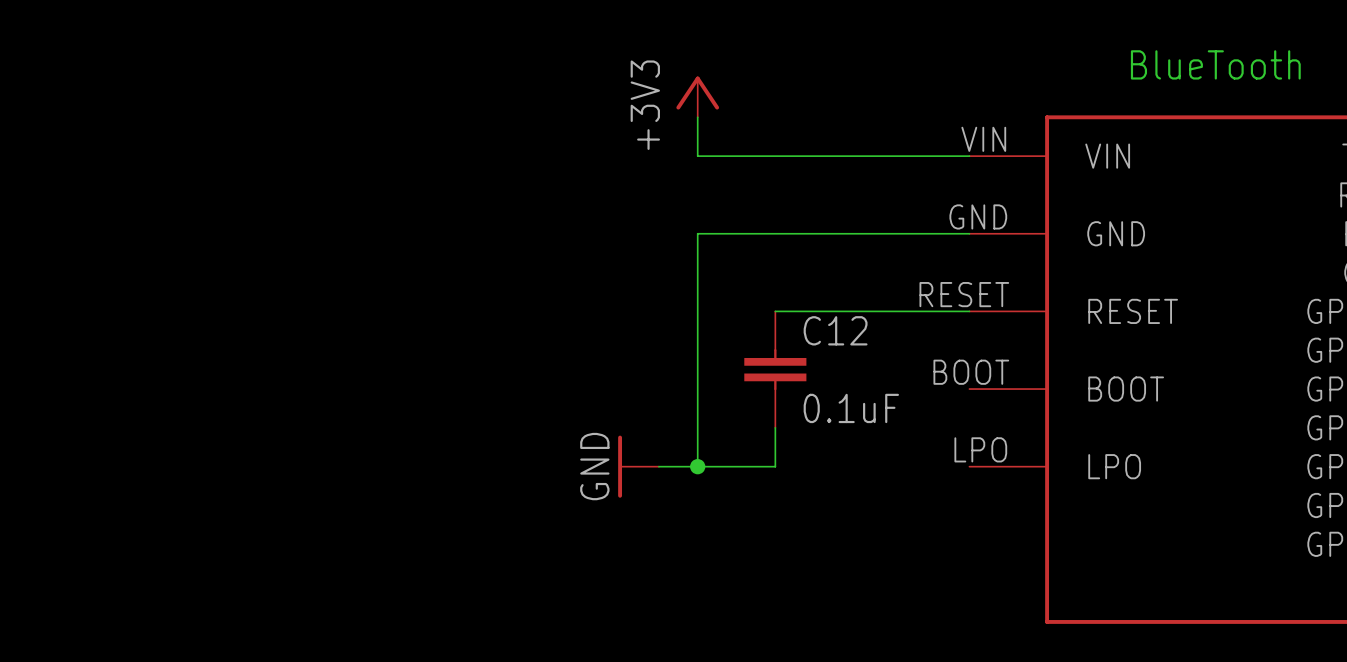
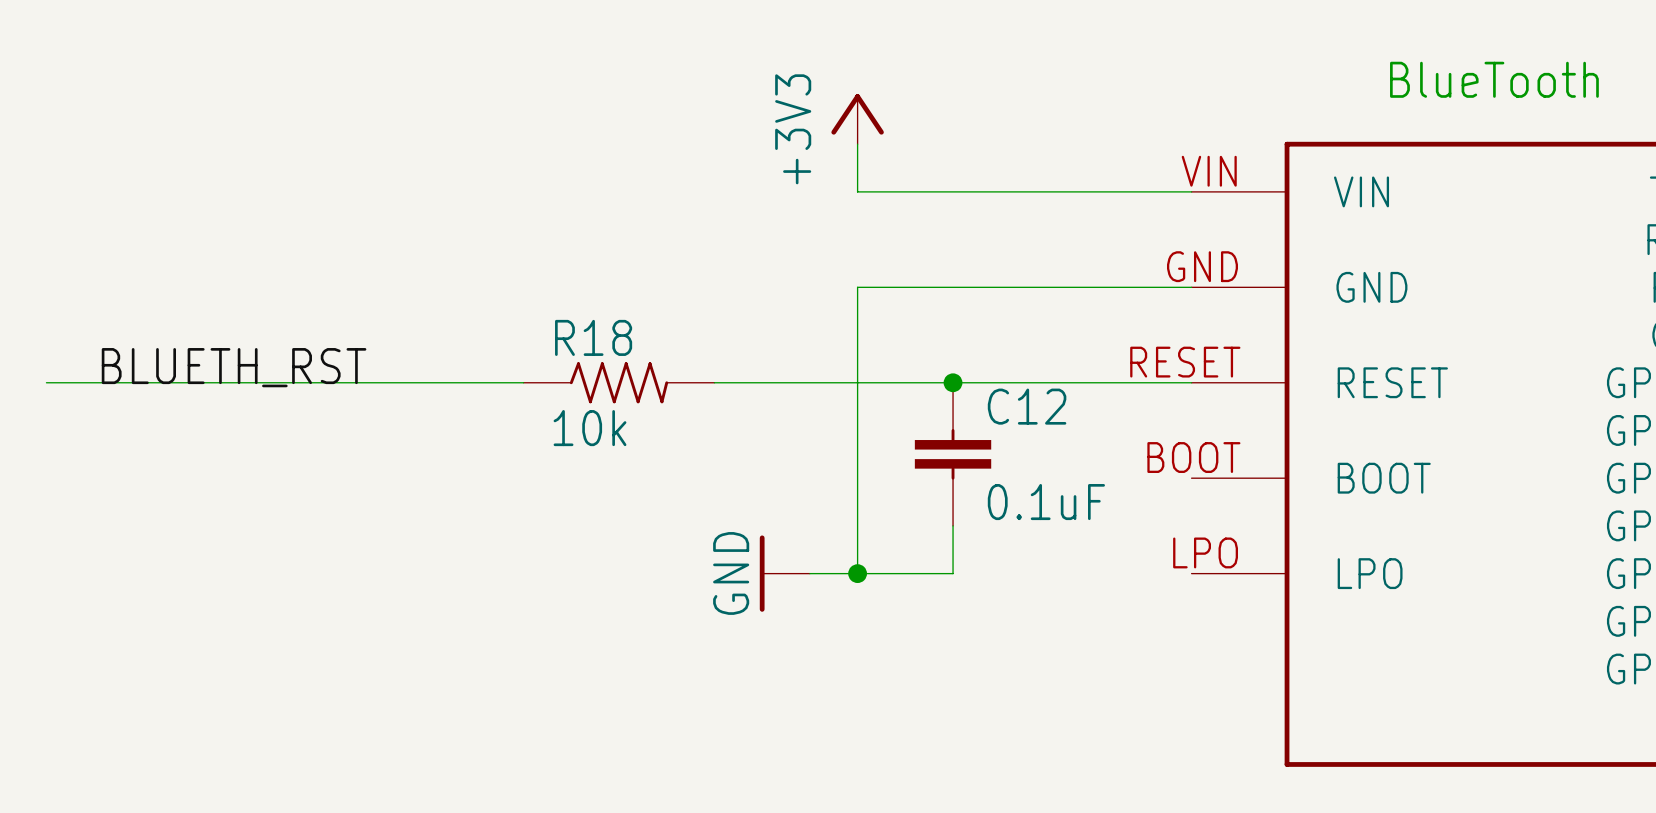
label: none -> BLUETH_RST (234, 367)
wire: none -> (46, 382) (523, 382)
R18: none -> 10k (619, 382)
wire: none -> (714, 382) (953, 382)
junction: none -> (953, 382)

